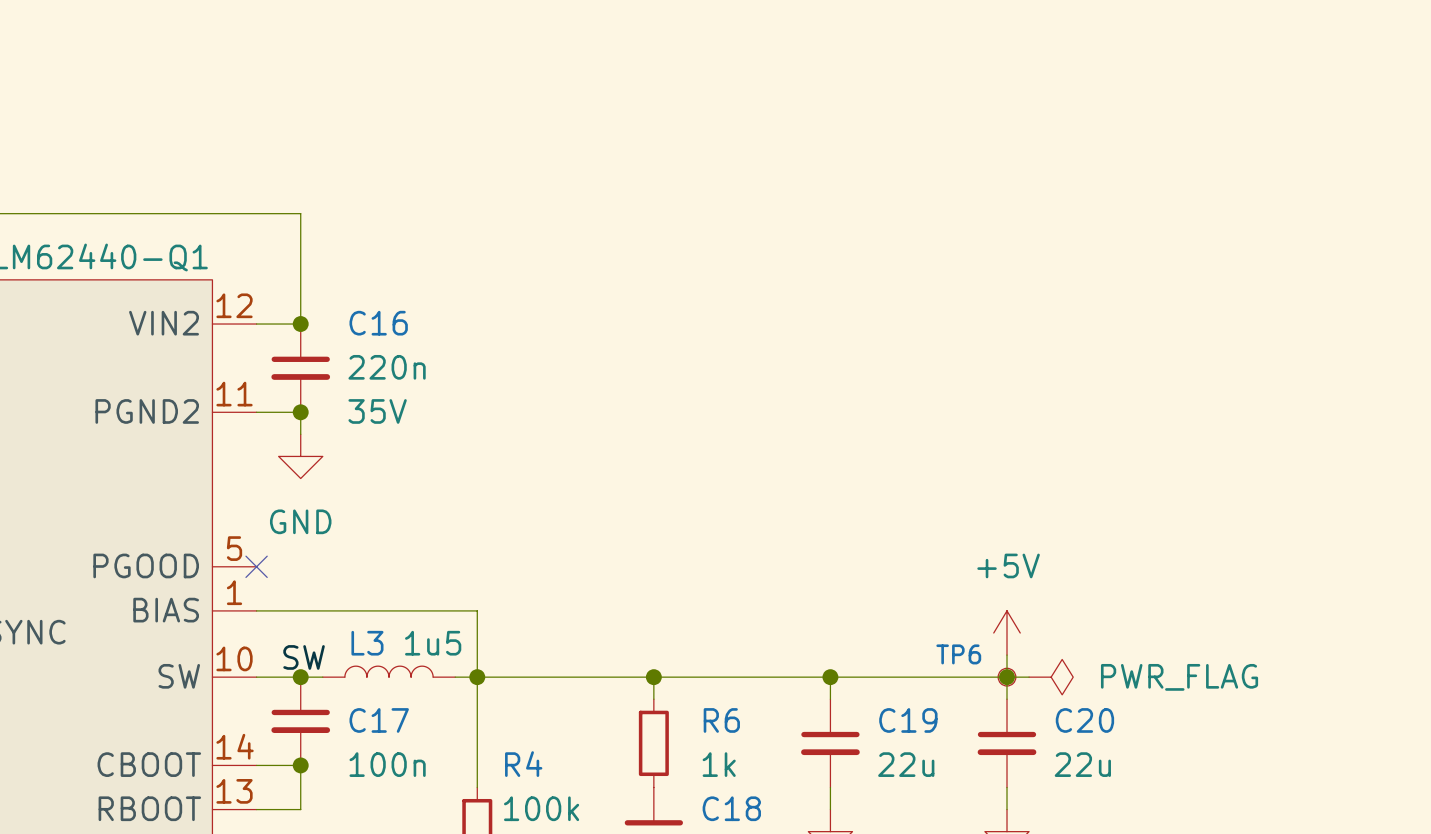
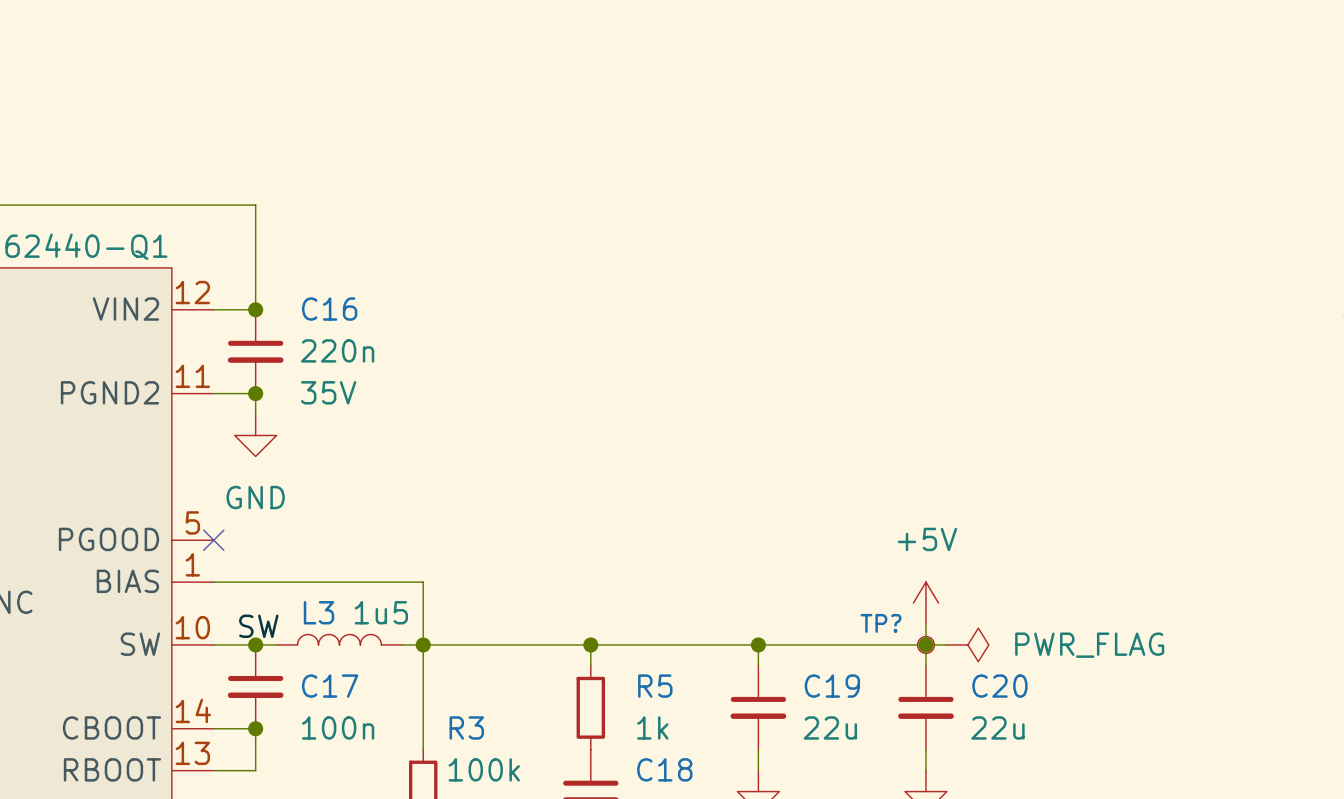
TP6 name: TP6 (958, 654) -> TP? (880, 623)
R6 name: R6 (721, 720) -> R5 (655, 686)
R4 name: R4 (523, 764) -> R3 (466, 727)

